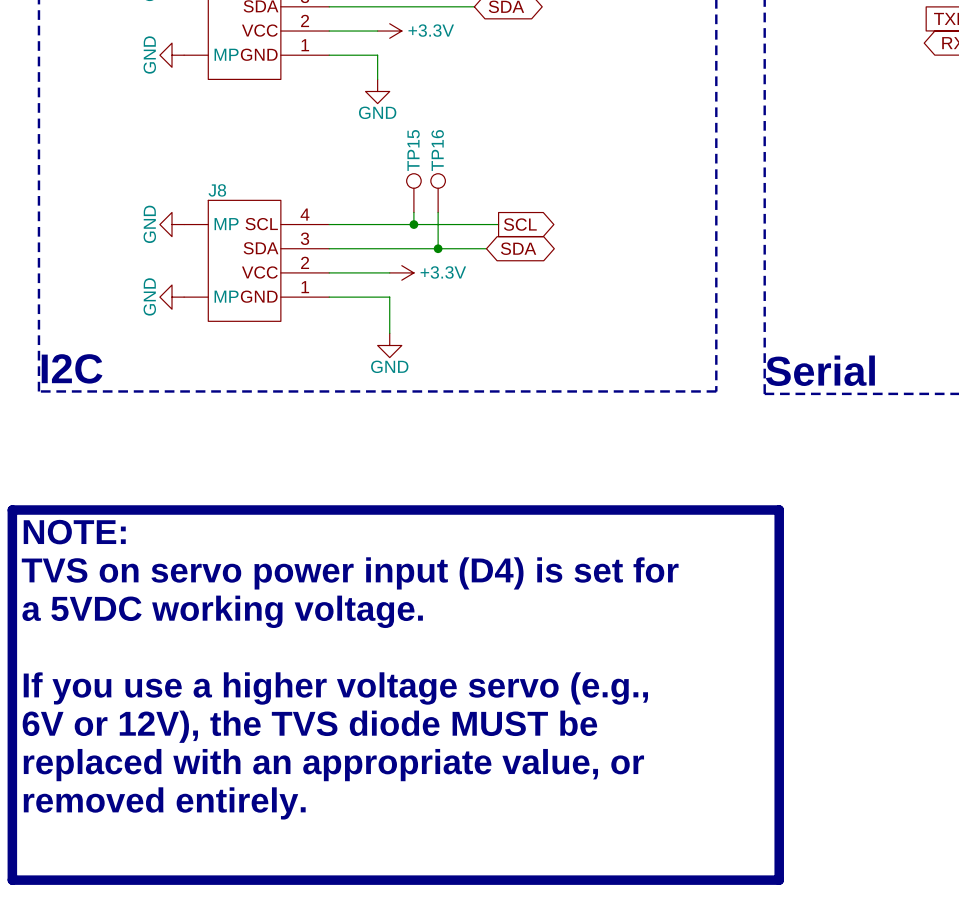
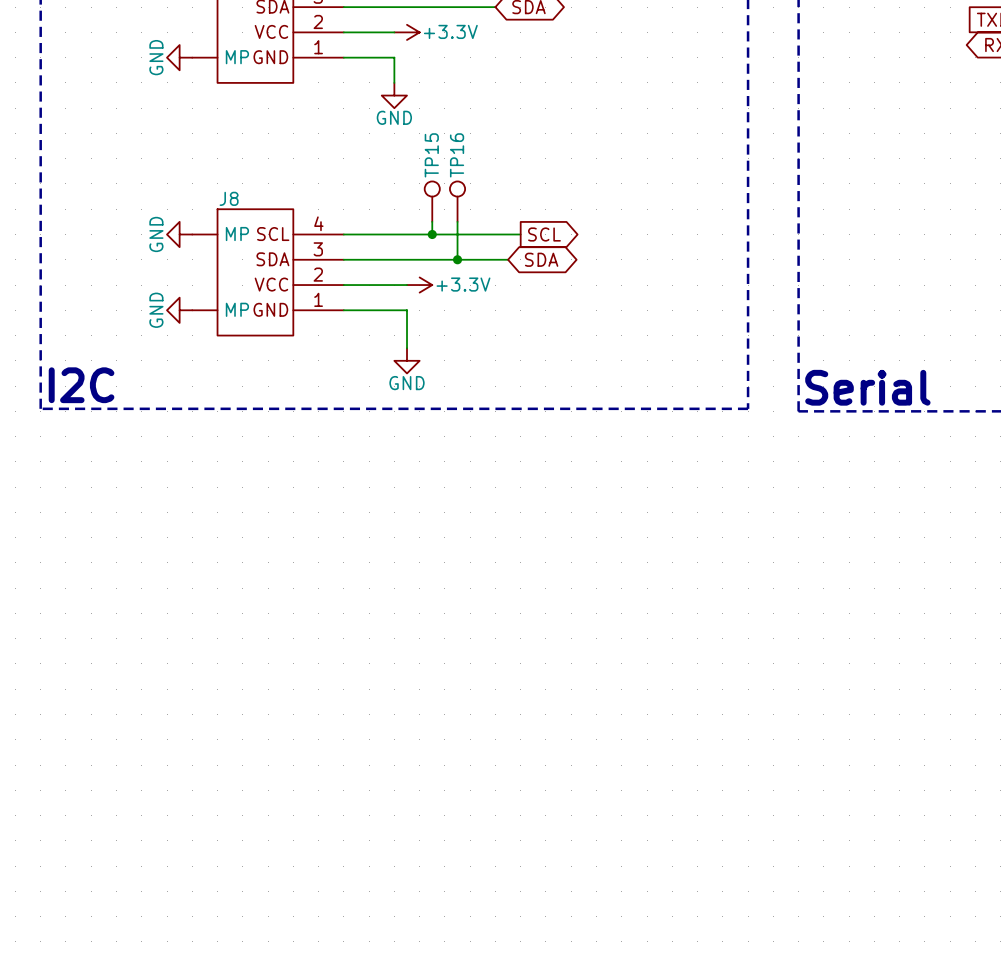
line: (12, 510) (779, 510) (779, 880) (12, 880) (12, 510) -> none
text: NOTE: (74, 532) -> none
text: TVS on servo power input (D4) is set for (350, 573) -> none
text: a 5VDC working voltage. (222, 611) -> none
text: If you use a higher voltage servo (e.g., (335, 688) -> none
text: 6V or 12V), the TVS diode MUST be (309, 726) -> none
text: replaced with an appropriate value, or (333, 765) -> none
text: removed entirely. (164, 803) -> none

